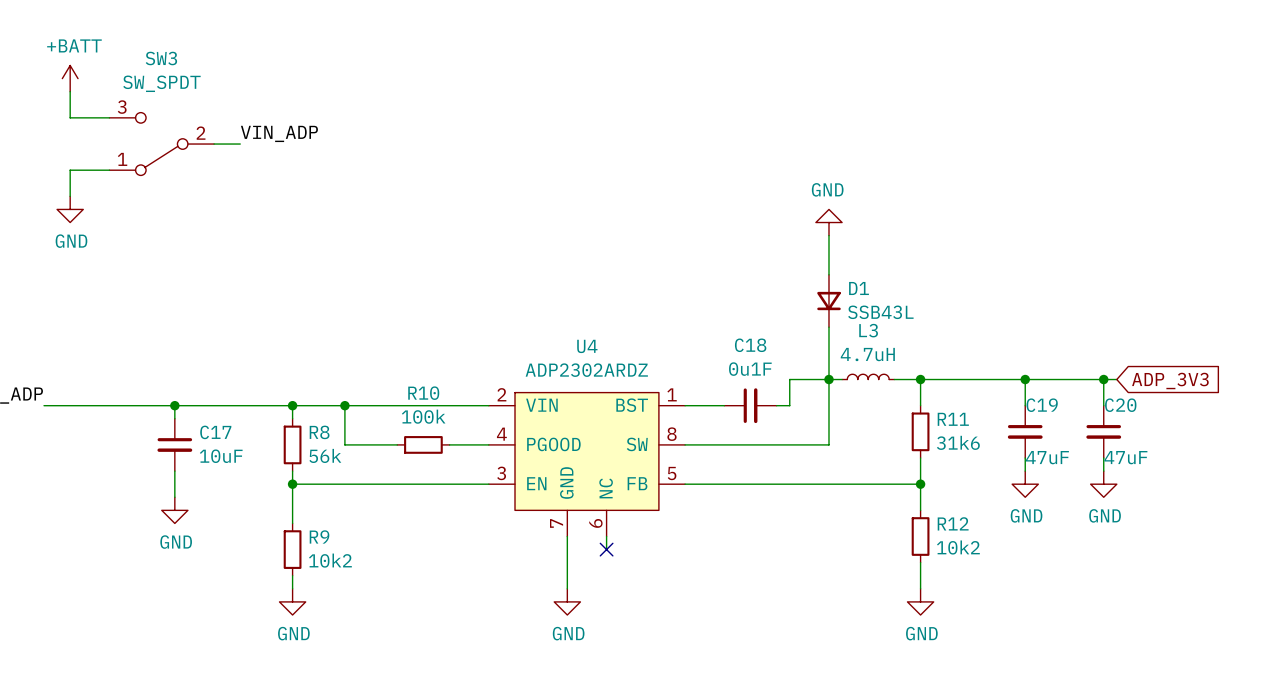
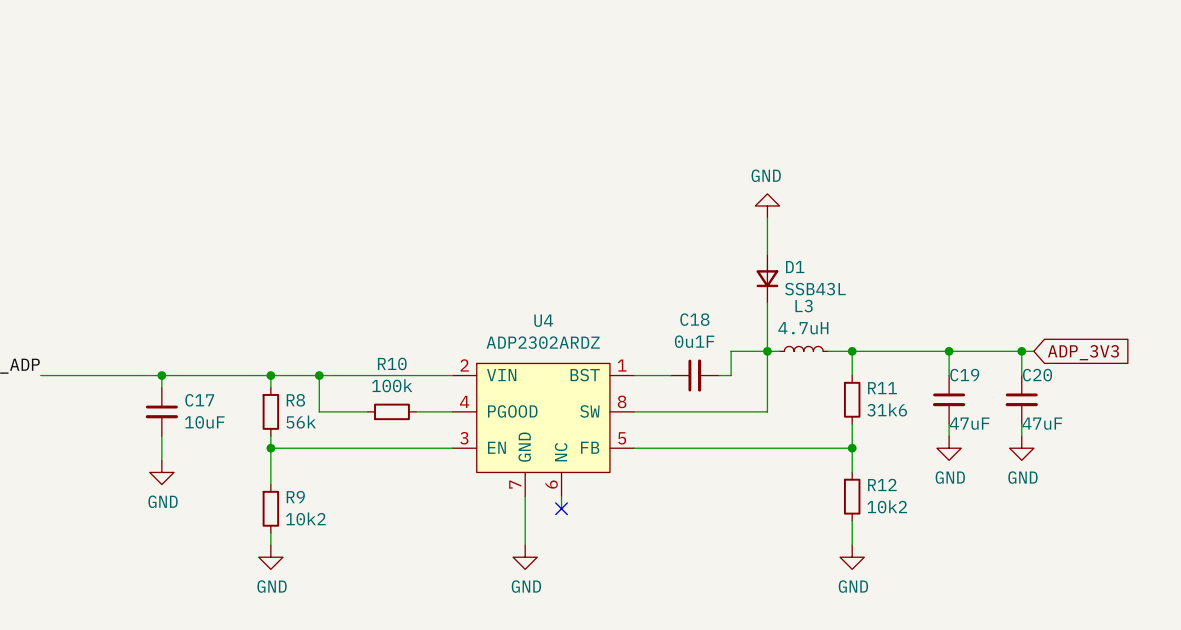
power symbol: +BATT (70, 78) -> none
wire: (70, 91) (70, 117) (109, 117) -> none
label: VIN_ADP (279, 133) -> none
SW3: SW_SPDT (161, 144) -> none
wire: (214, 144) (240, 144) -> none
wire: (109, 170) (70, 170) (70, 196) -> none
power symbol: GND (70, 209) -> none

